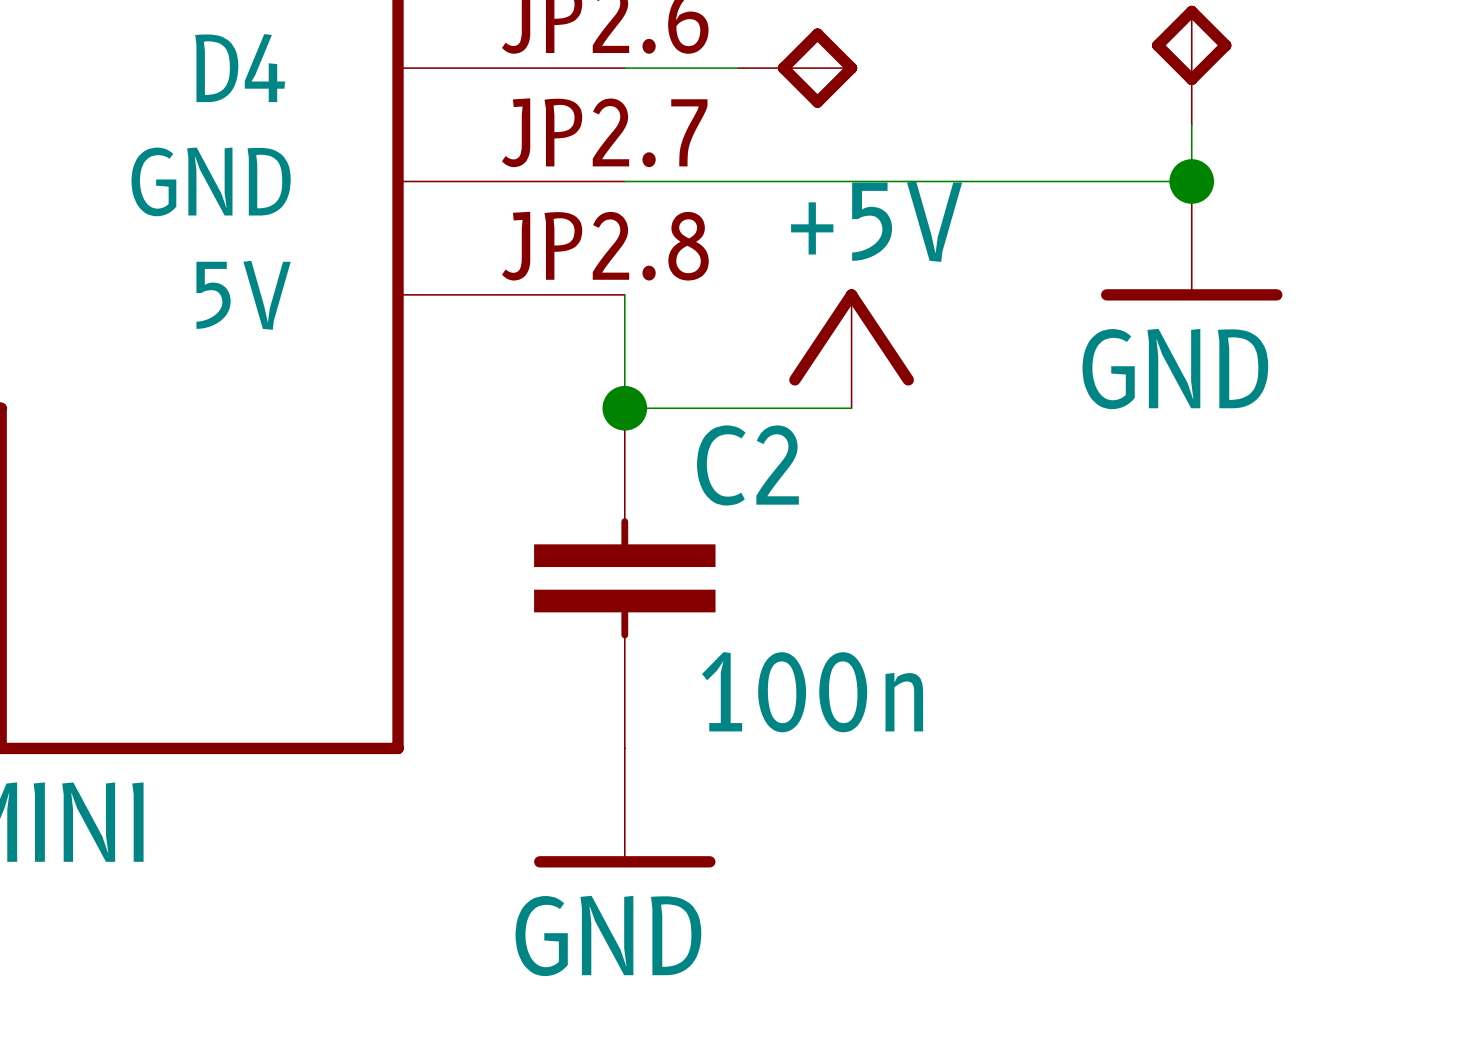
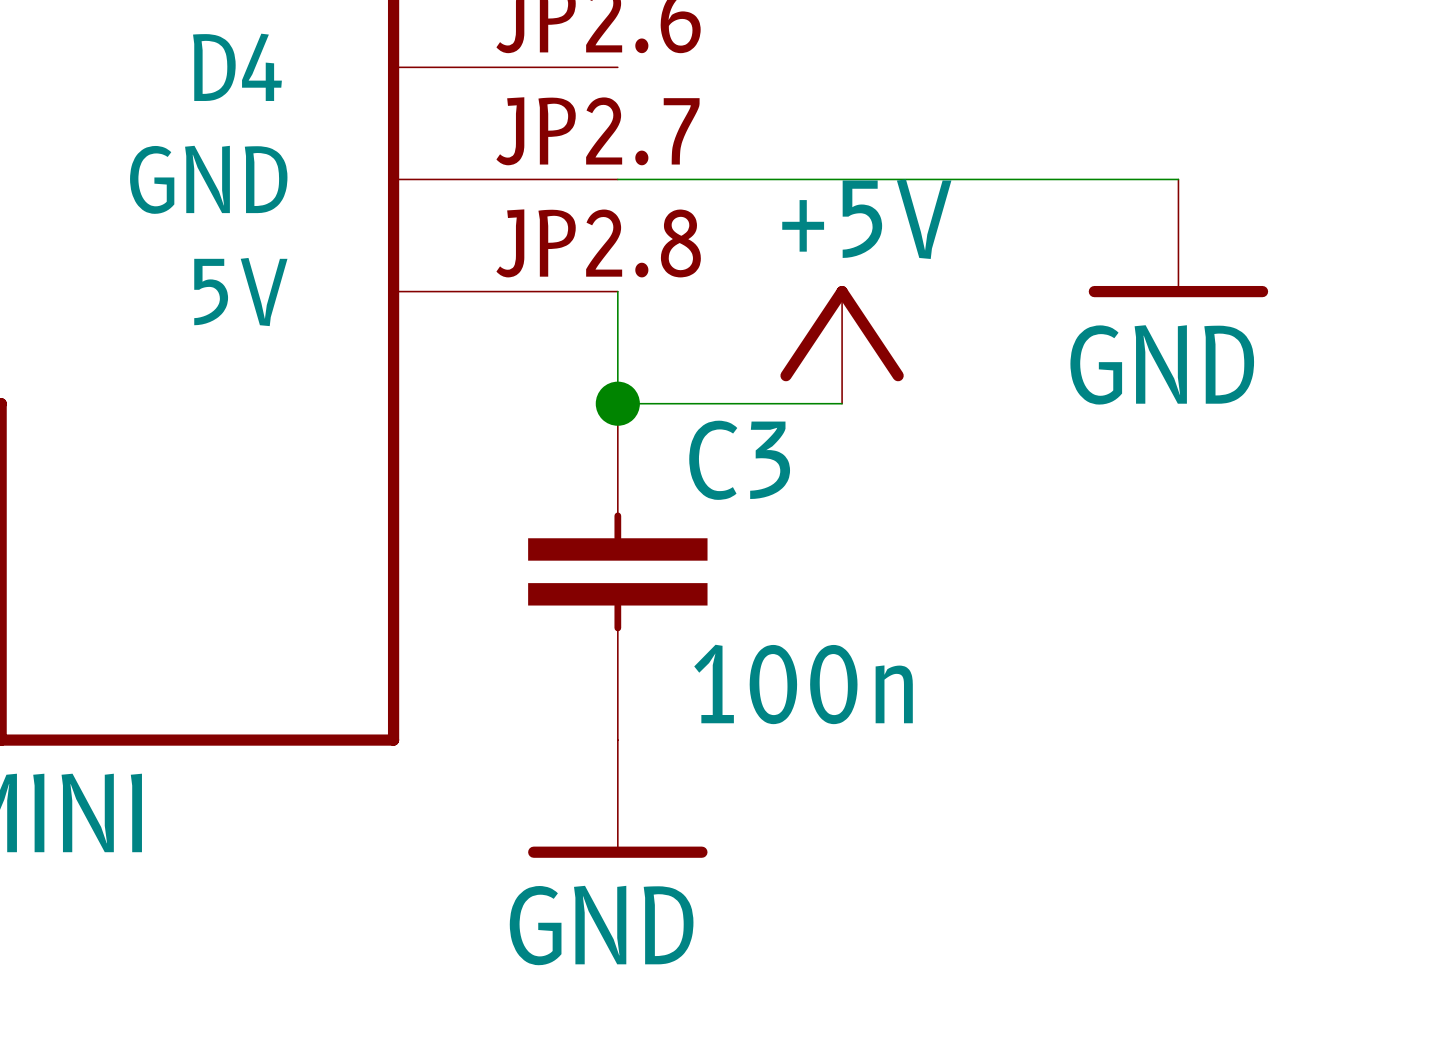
part: (1191, 65) -> none
wire: (624, 68) (738, 68) -> none
part: (797, 68) -> none
wire: (1191, 124) (1191, 181) -> none
junction: (1191, 181) -> none
C2 name: C2 (747, 465) -> C3 (739, 460)

